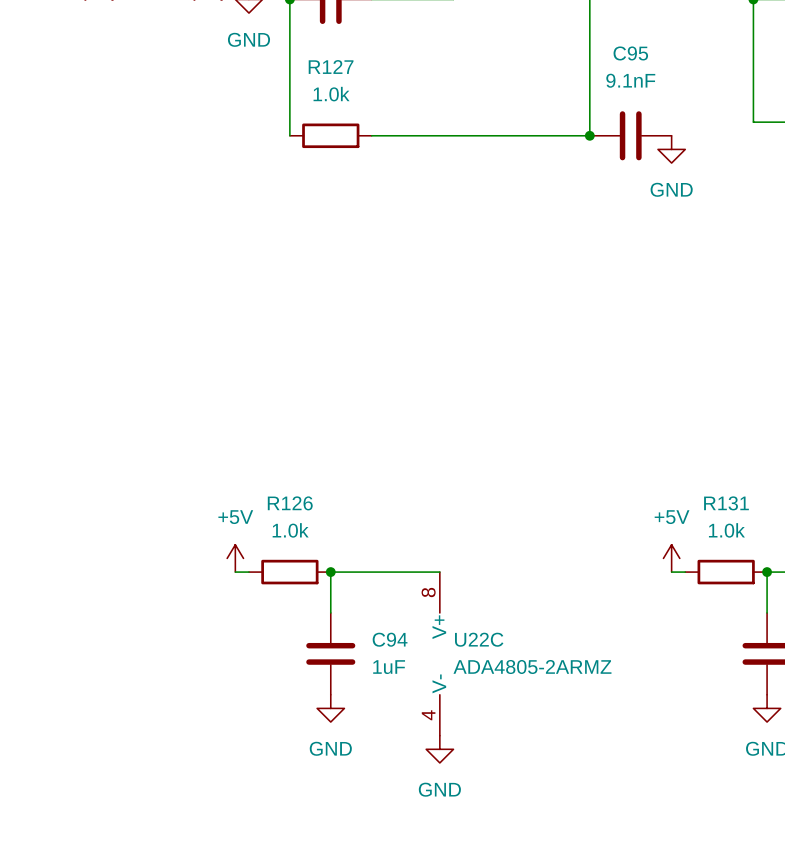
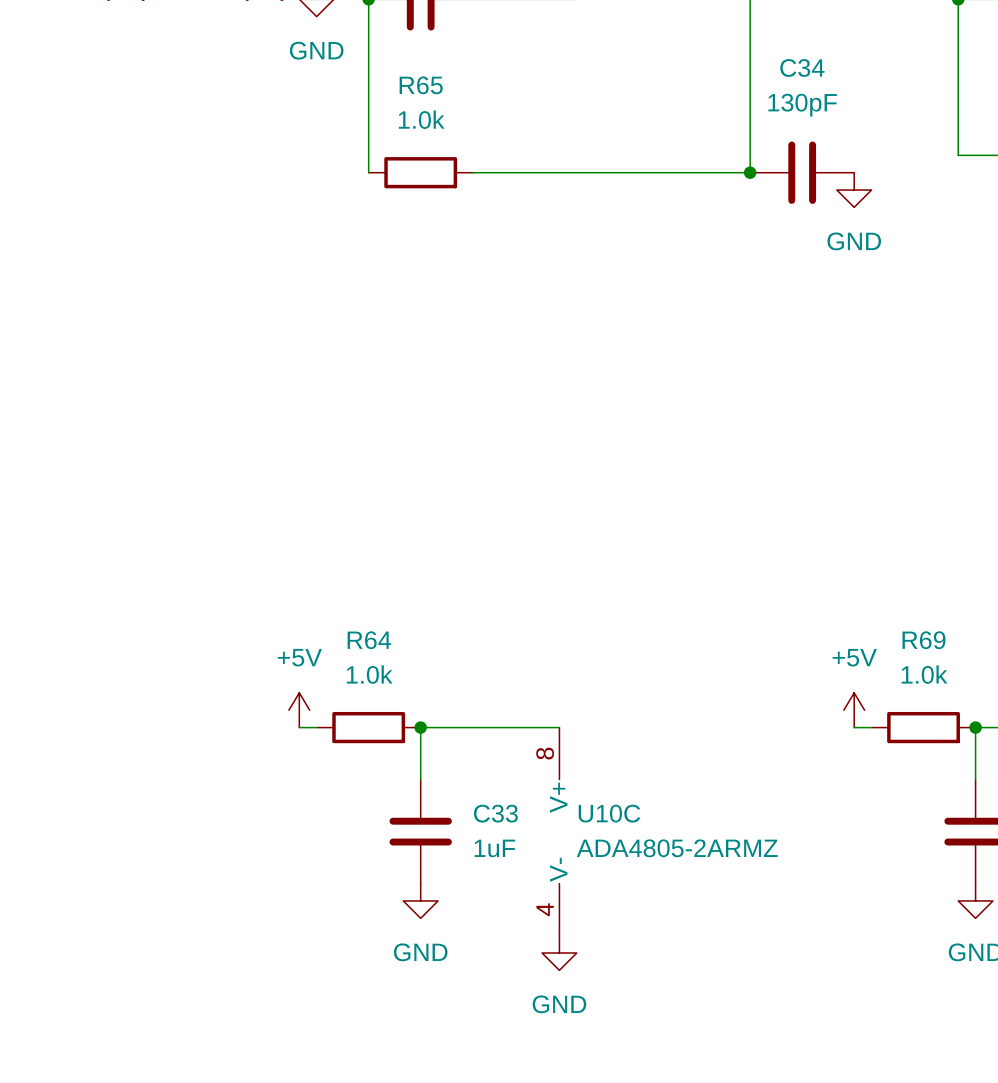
C95 name: C95 (630, 53) -> C34 (802, 68)
R127 name: R127 (331, 67) -> R65 (421, 85)
C95 value: 9.1nF (630, 80) -> 130pF (802, 105)
R126 name: R126 (290, 503) -> R64 (369, 640)
R131 name: R131 (726, 503) -> R69 (923, 640)
C94 name: C94 (390, 639) -> C33 (495, 813)
U22C name: U22C (479, 639) -> U10C (609, 813)

